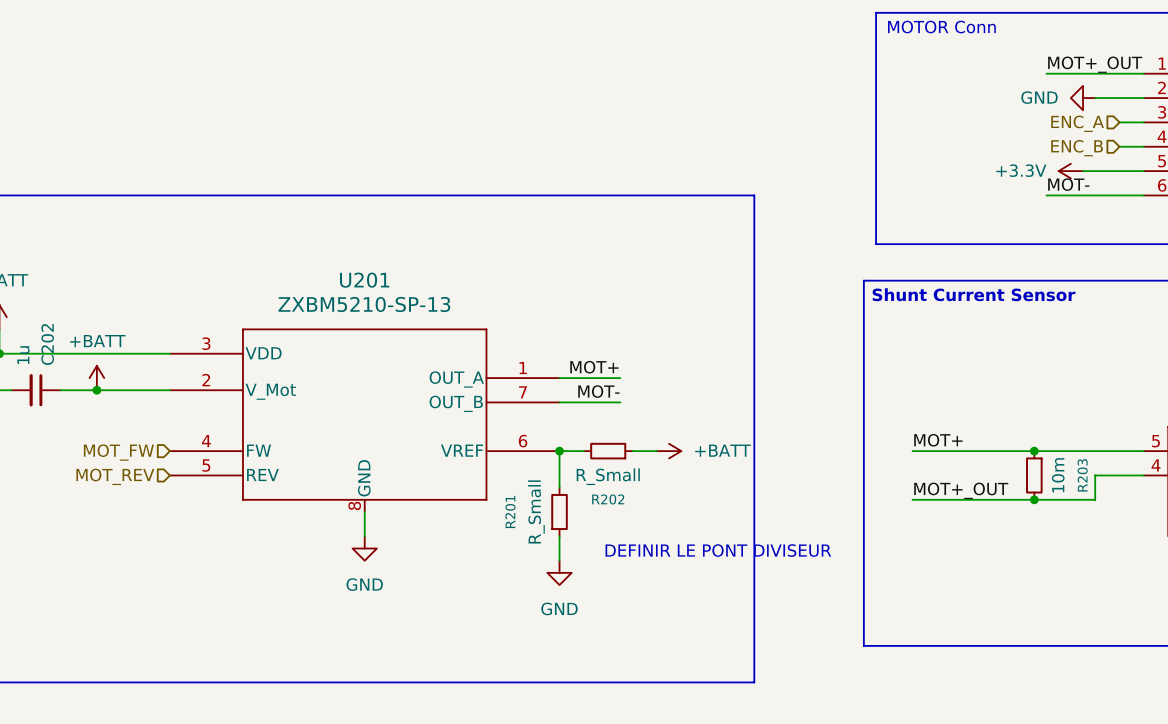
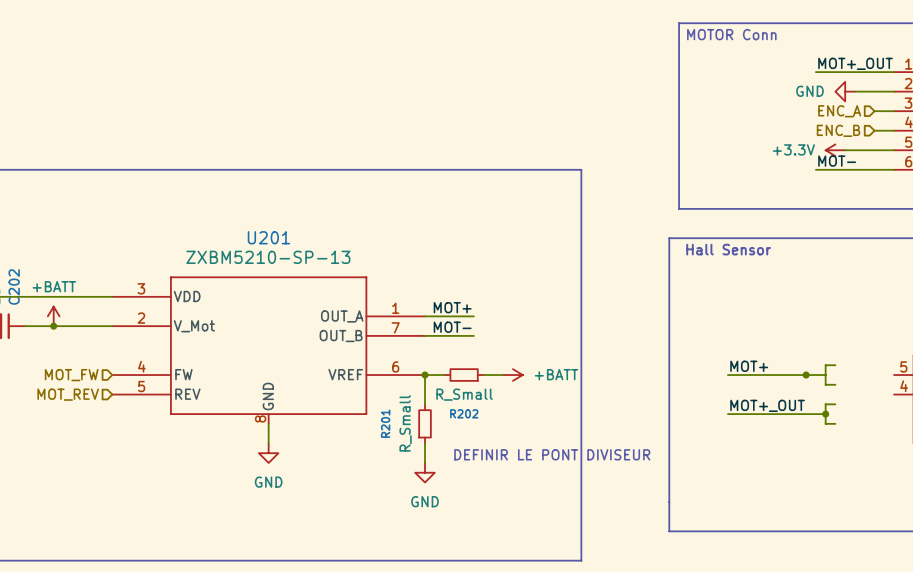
text: none -> Hall Sensor (728, 249)
text: Shunt Current Sensor (974, 294) -> none
wire: none -> (835, 365) (825, 365) (825, 384) (835, 384)
label position: MOT+ (938, 440) -> MOT+ (749, 366)
wire: (912, 451) (936, 451) -> none
wire: (1058, 451) (1143, 451) -> none
R203: 10m (1034, 475) -> none
wire: (1143, 475) (1095, 475) (1095, 499) (1058, 499) -> none
wire: none -> (835, 404) (825, 404) (825, 423) (835, 423)
label position: MOT+_OUT (961, 490) -> MOT+_OUT (767, 405)
wire: (912, 499) (936, 499) -> none
junction position: (1034, 499) -> (825, 414)

